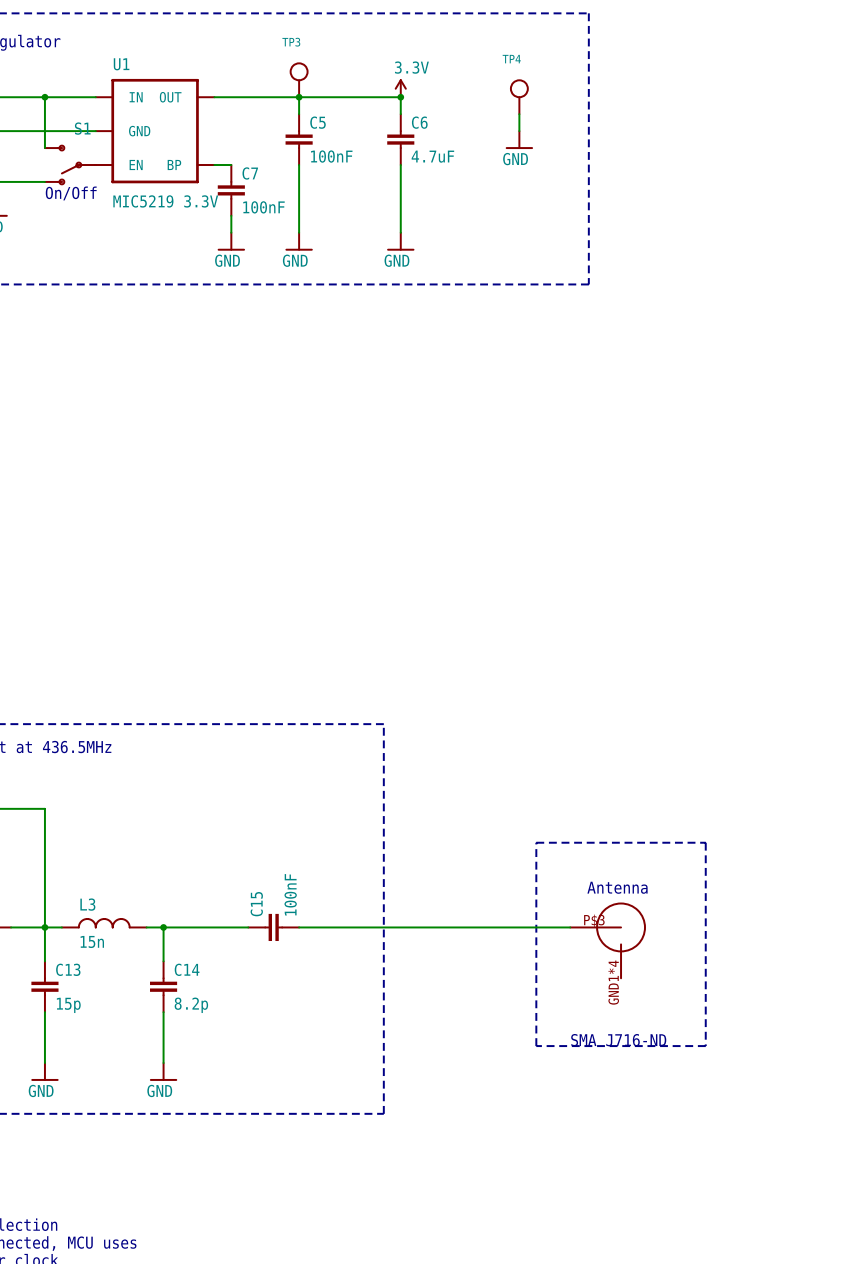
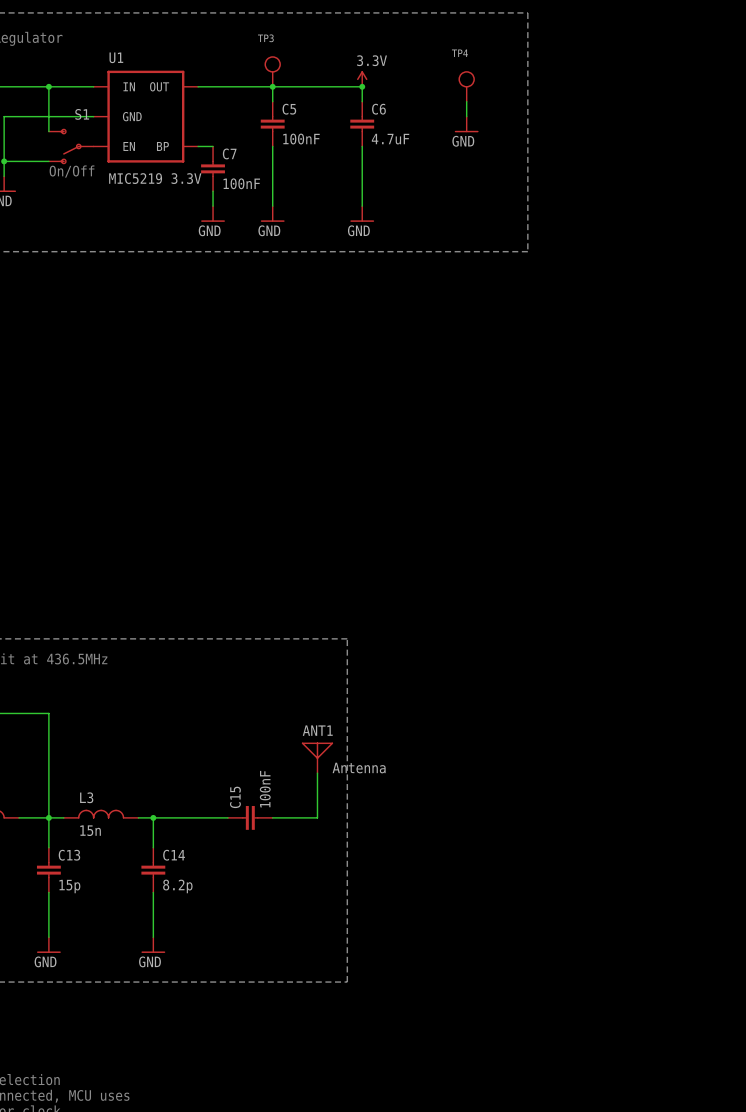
line: (536, 842) (705, 842) (705, 1046) (536, 1046) (536, 842) -> none
ANT1: none -> Antenna (317, 757)
text: Antenna (617, 887) -> none
wire: (349, 927) (570, 927) -> (317, 817) (317, 773)
part: (608, 940) -> none
text: SMA J716-ND (618, 1040) -> none

